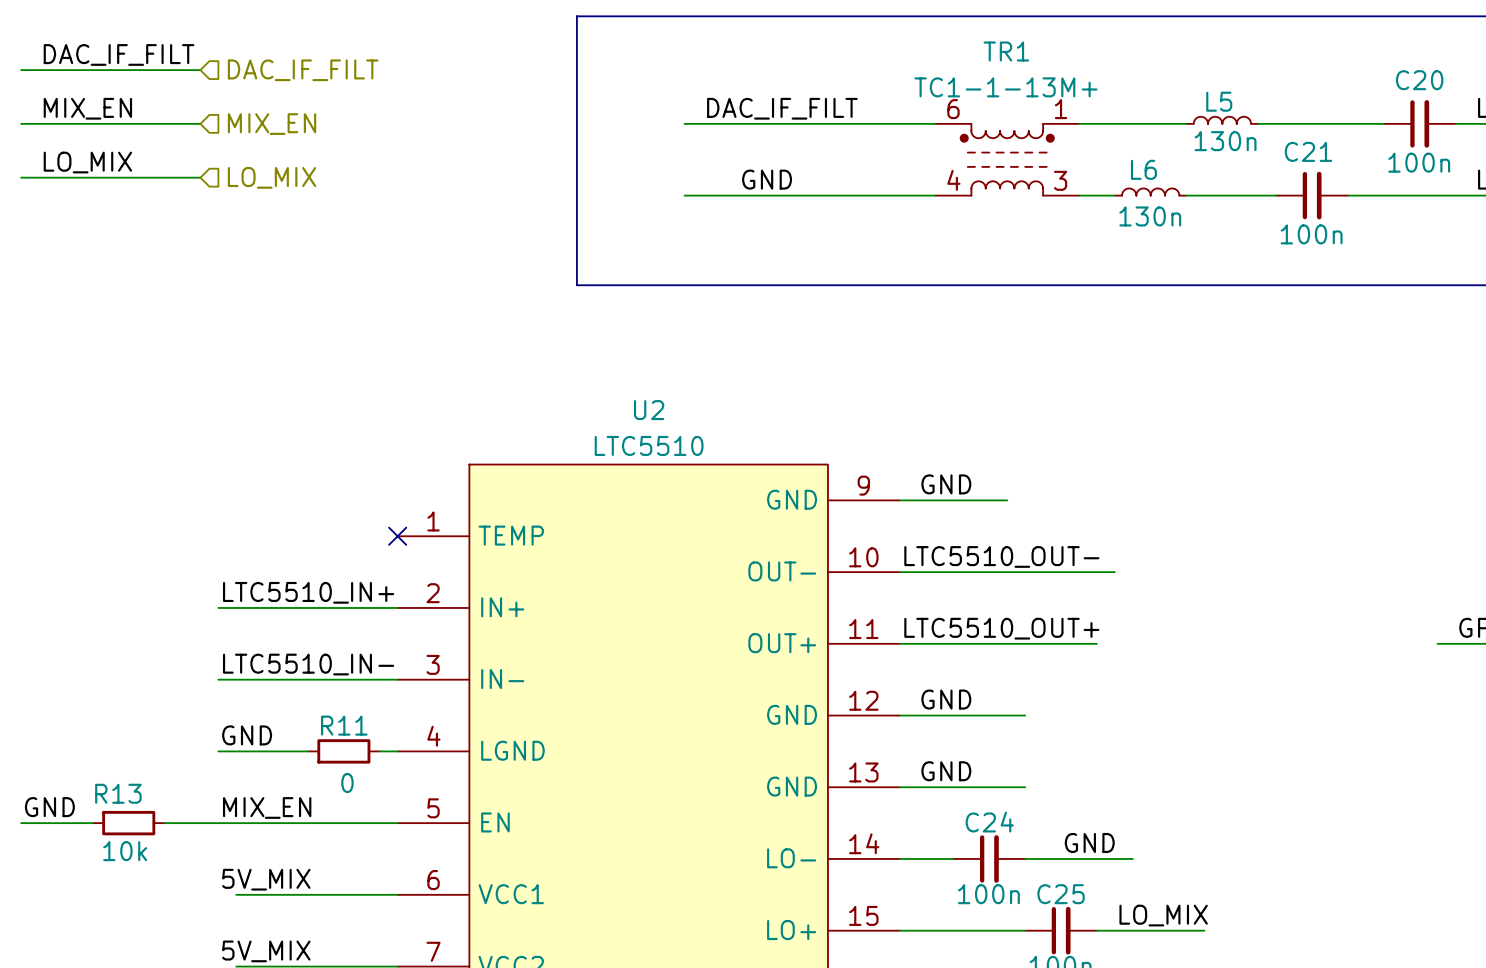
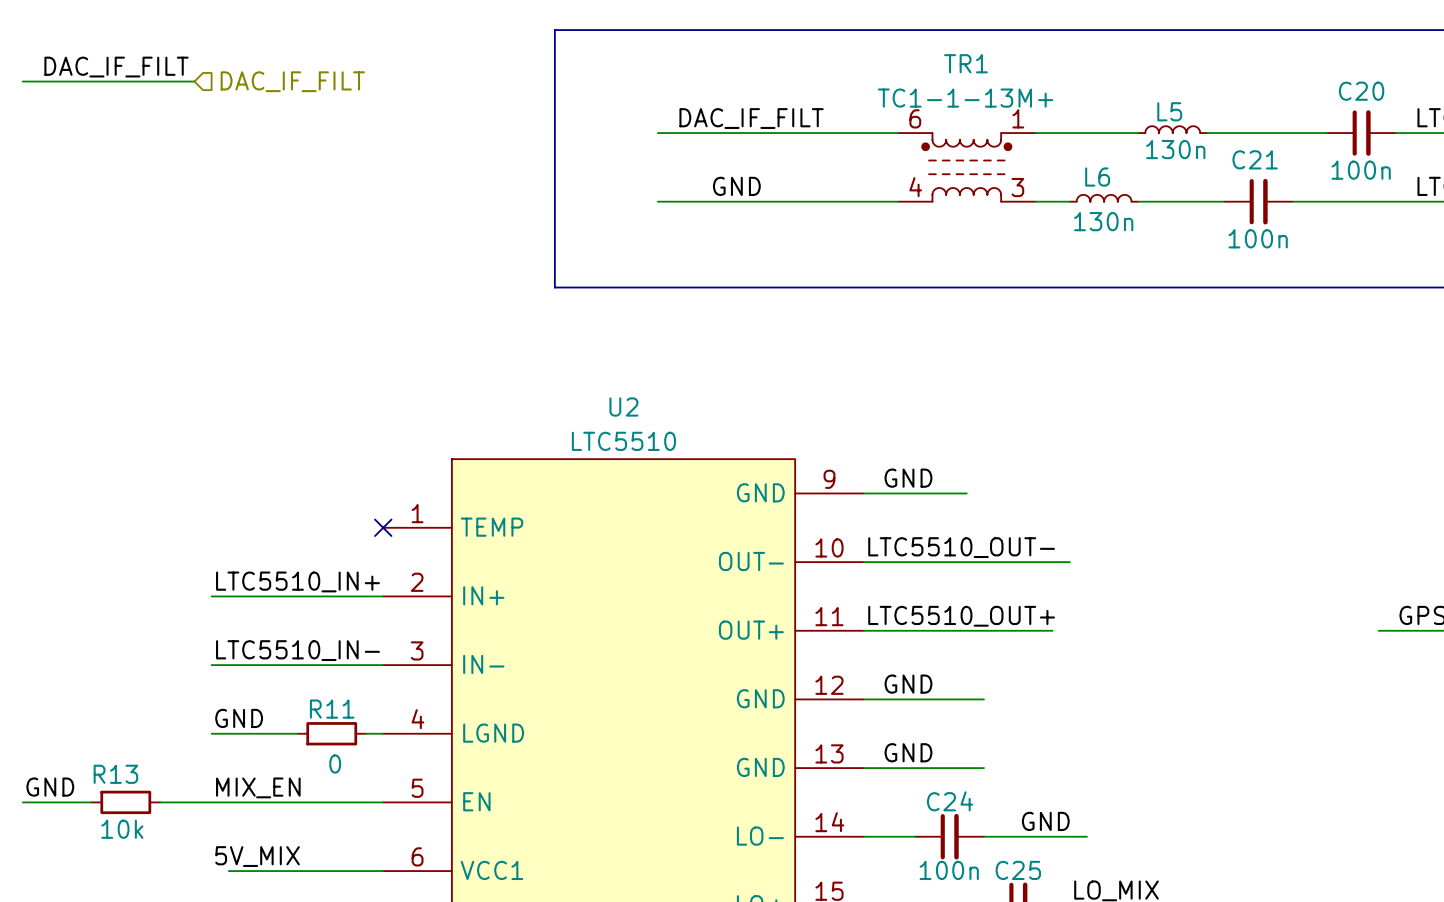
label: MIX_EN (87, 108) -> none
wire: (21, 123) (200, 123) -> none
hierarchical label: MIX_EN (272, 124) -> none
label: LO_MIX (87, 162) -> none
wire: (21, 177) (200, 177) -> none
hierarchical label: LO_MIX (272, 177) -> none

